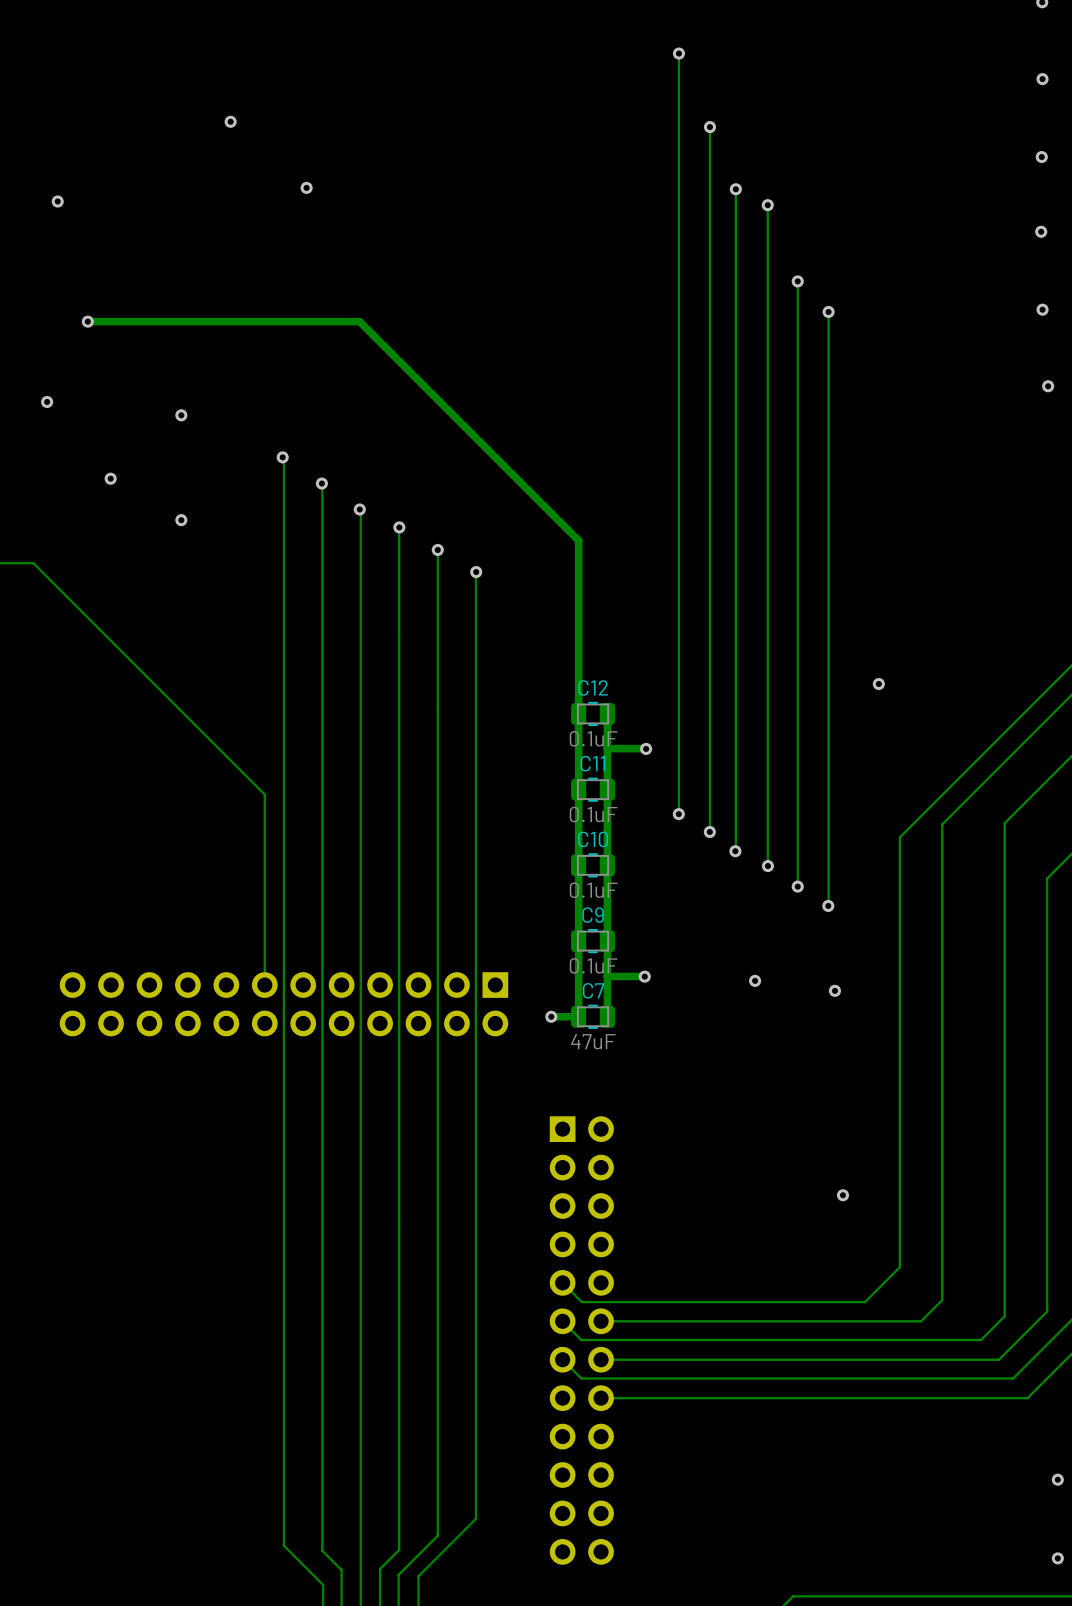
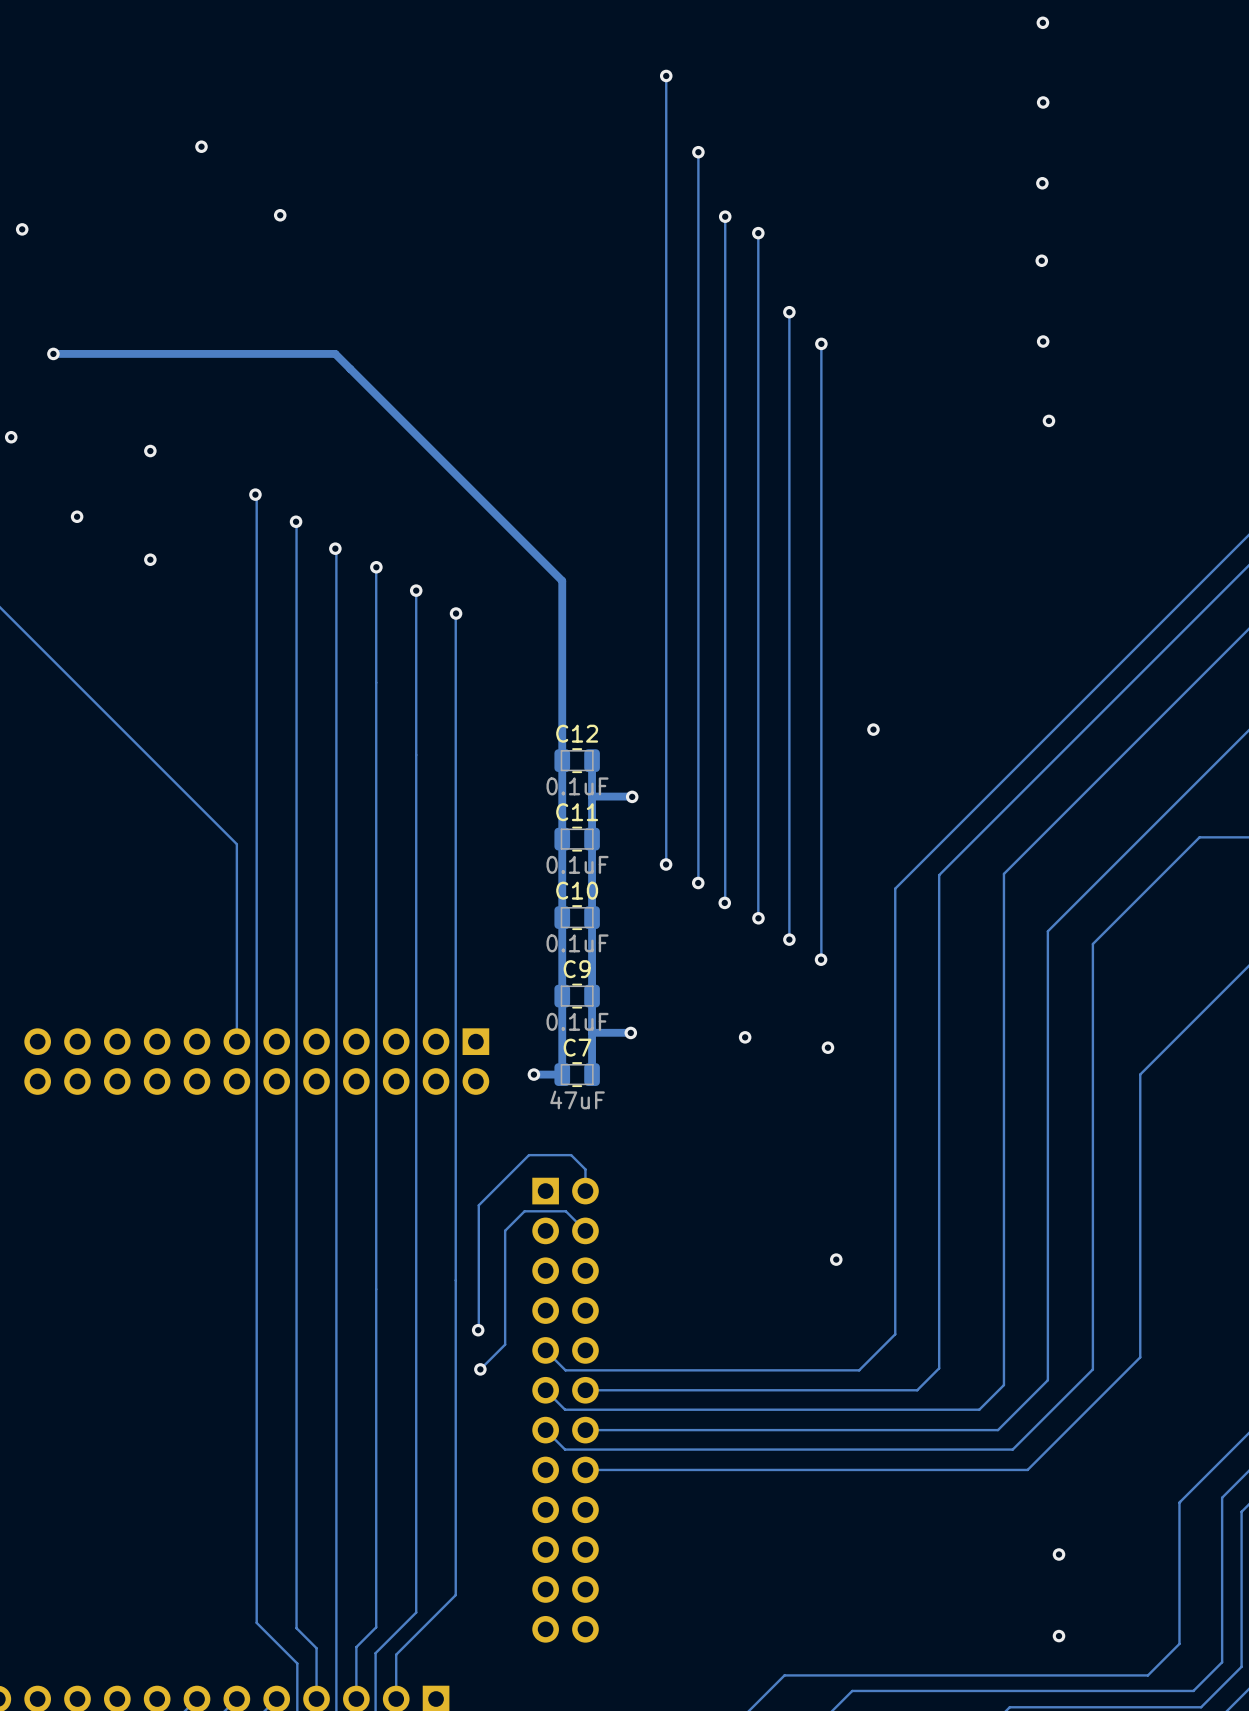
track: none -> (585, 1191) (585, 1169) (571, 1155) (528, 1155) (478, 1205) (478, 1330)
track: none -> (585, 1230) (565, 1211) (524, 1211) (505, 1230) (505, 1344) (480, 1369)
via: none -> (478, 1330)
via: none -> (480, 1369)

